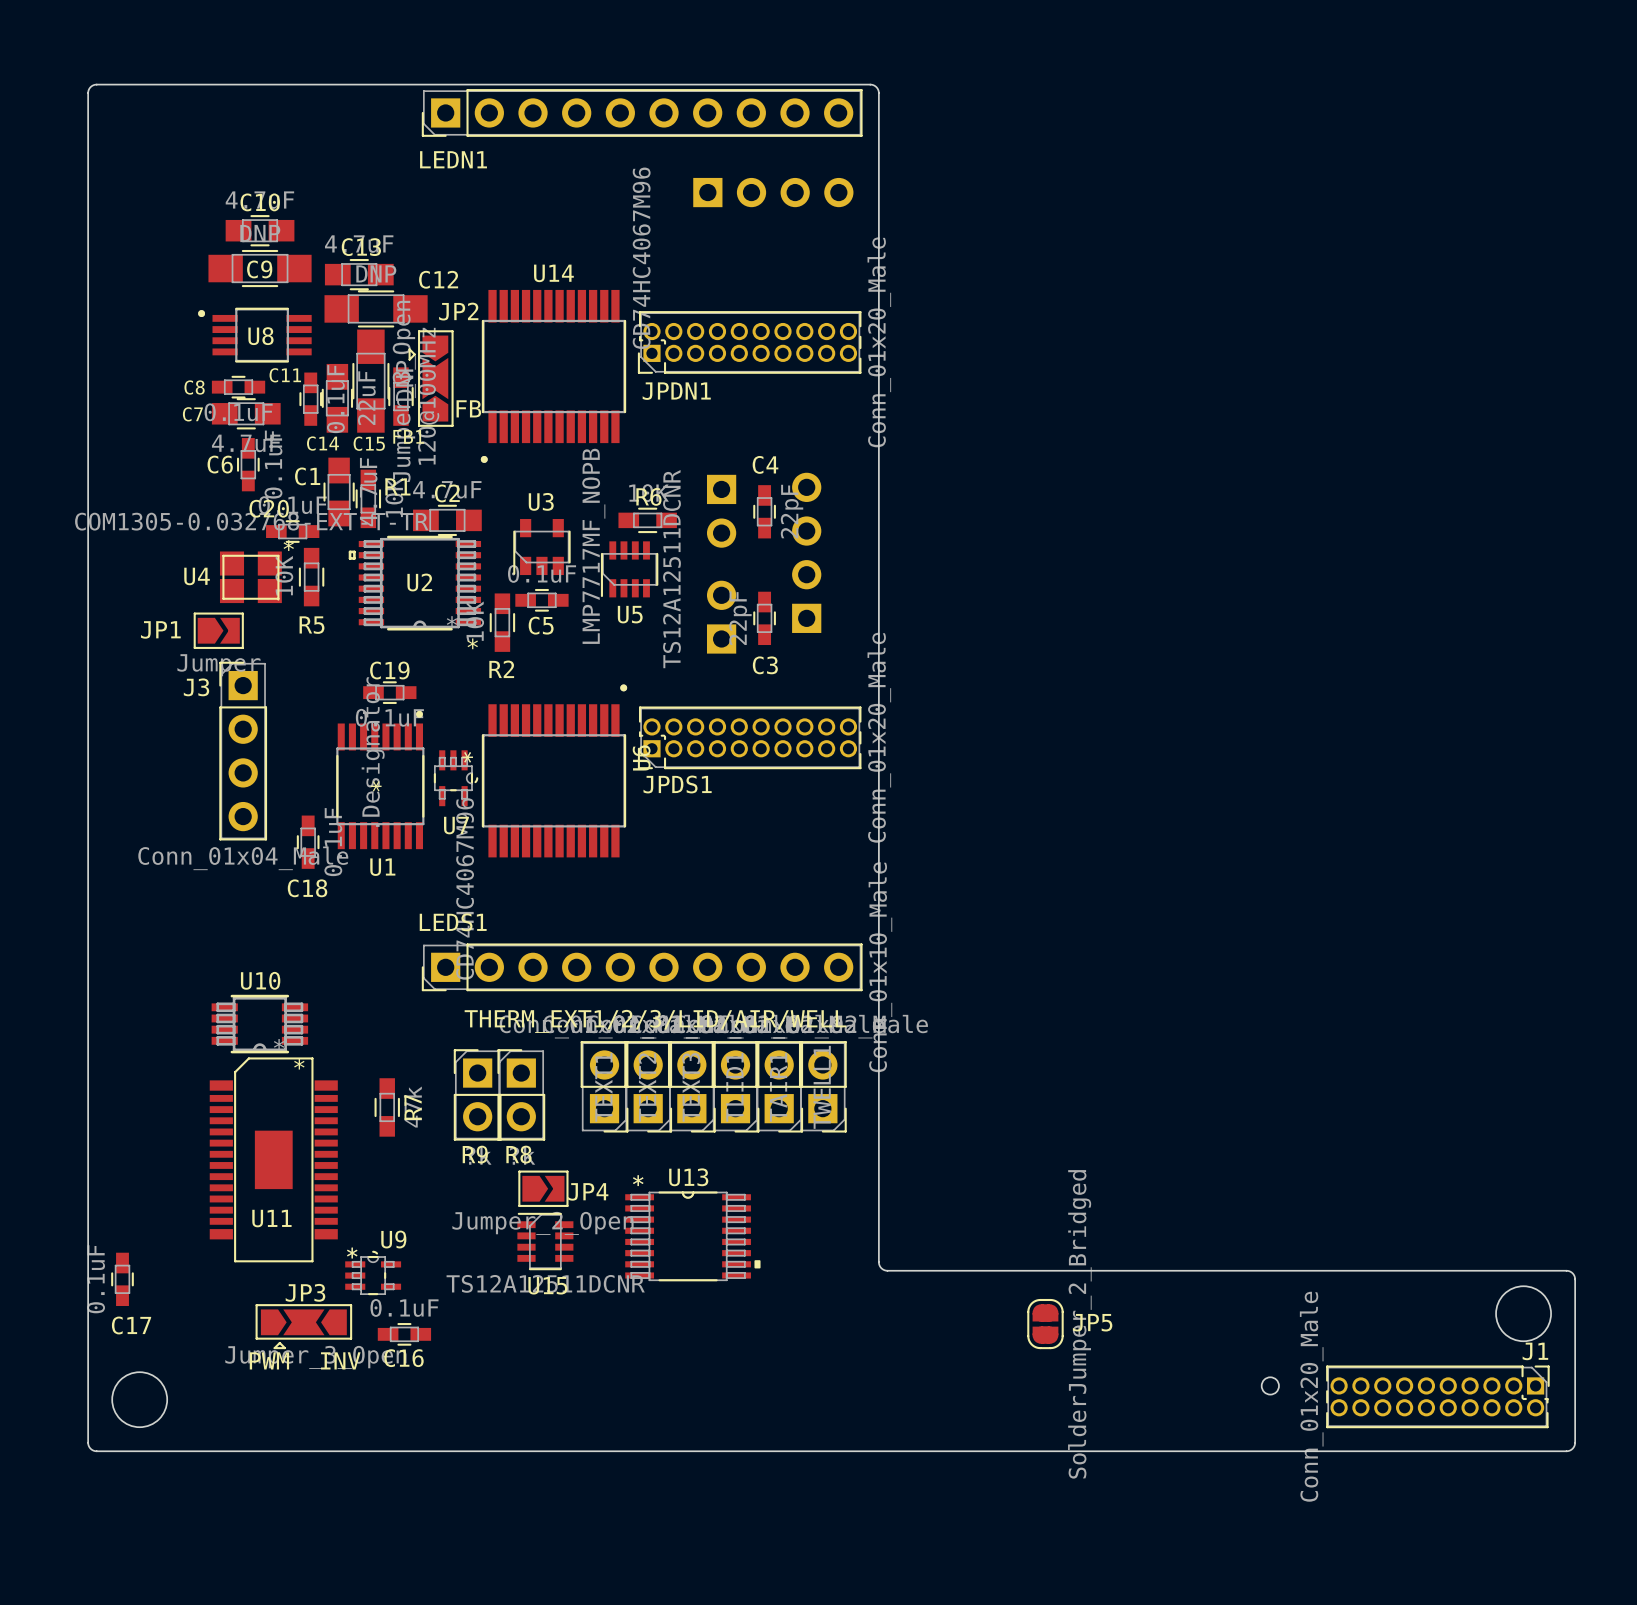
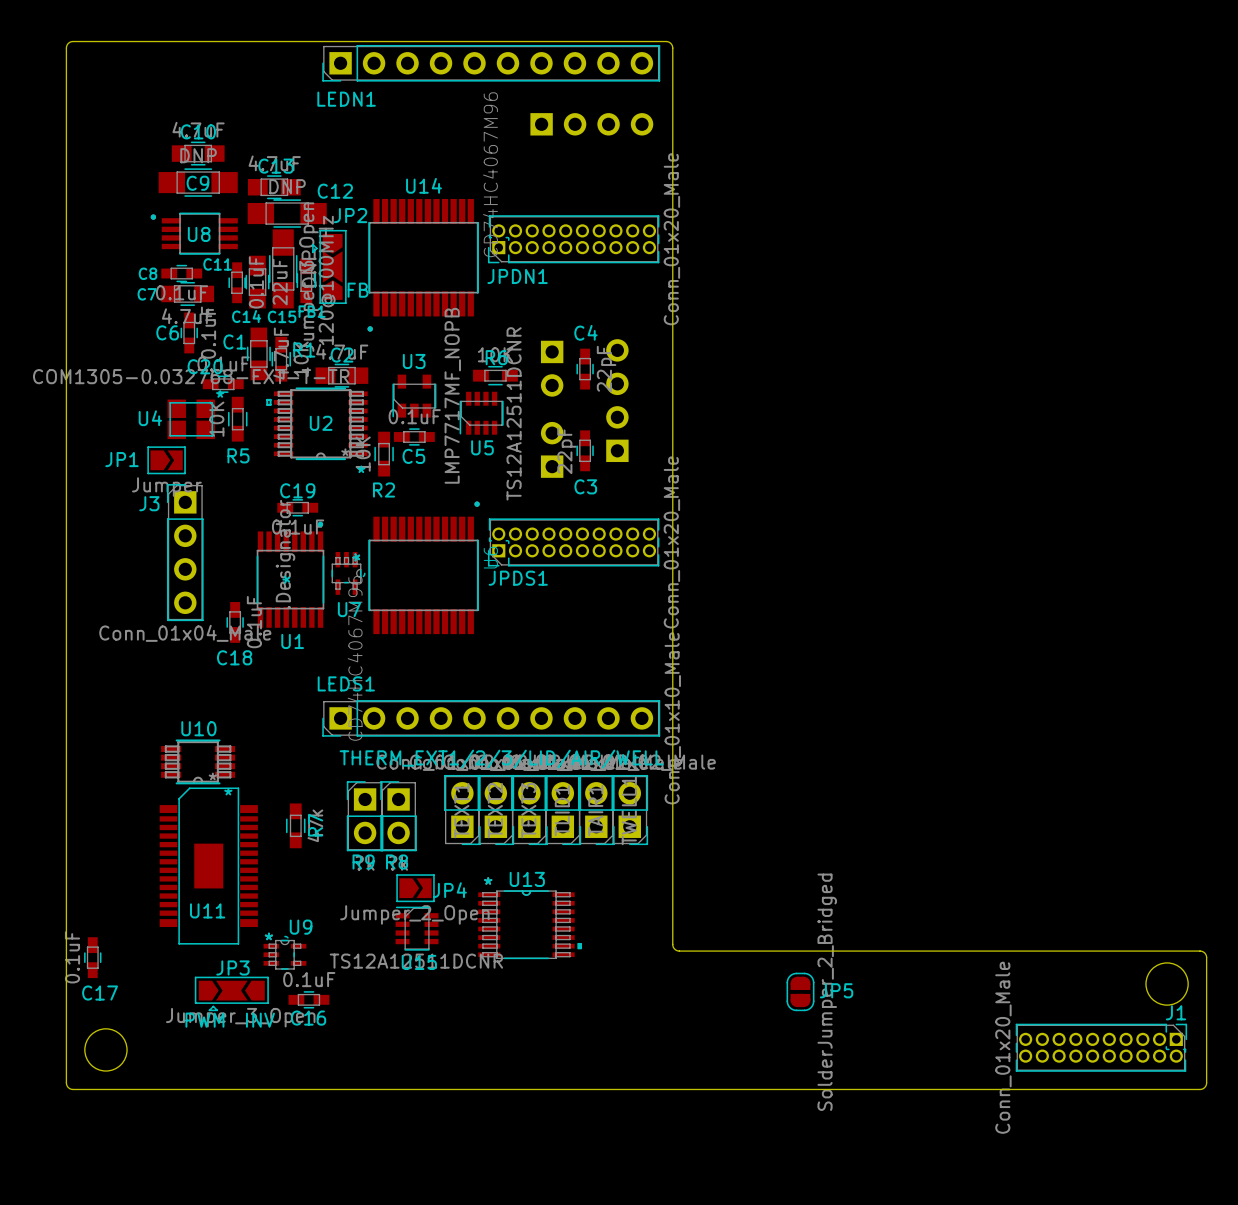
round board edge: [1260, 1376, 1280, 1396] -> none

